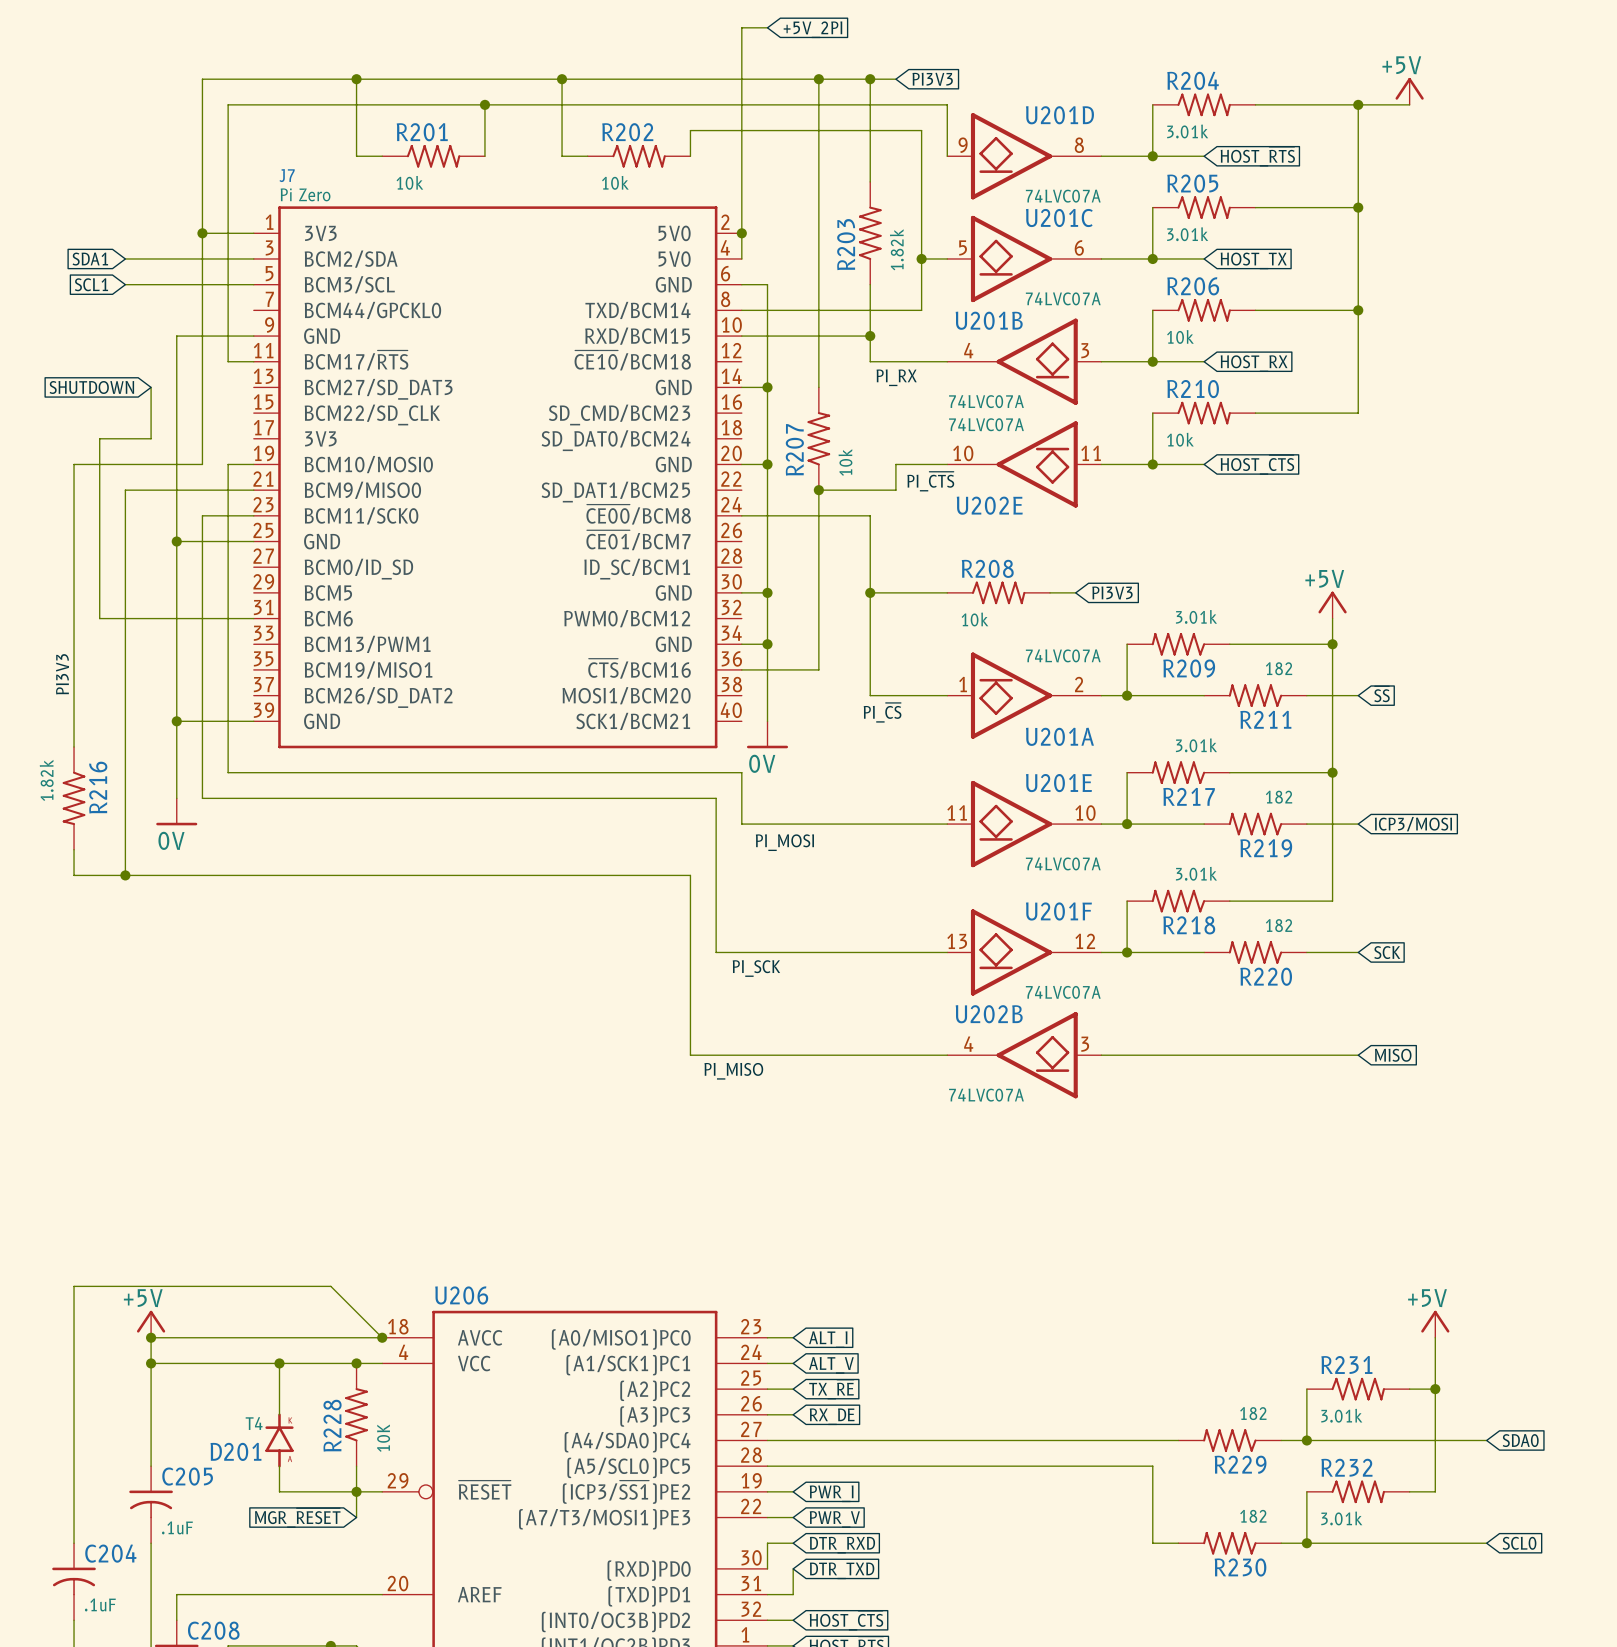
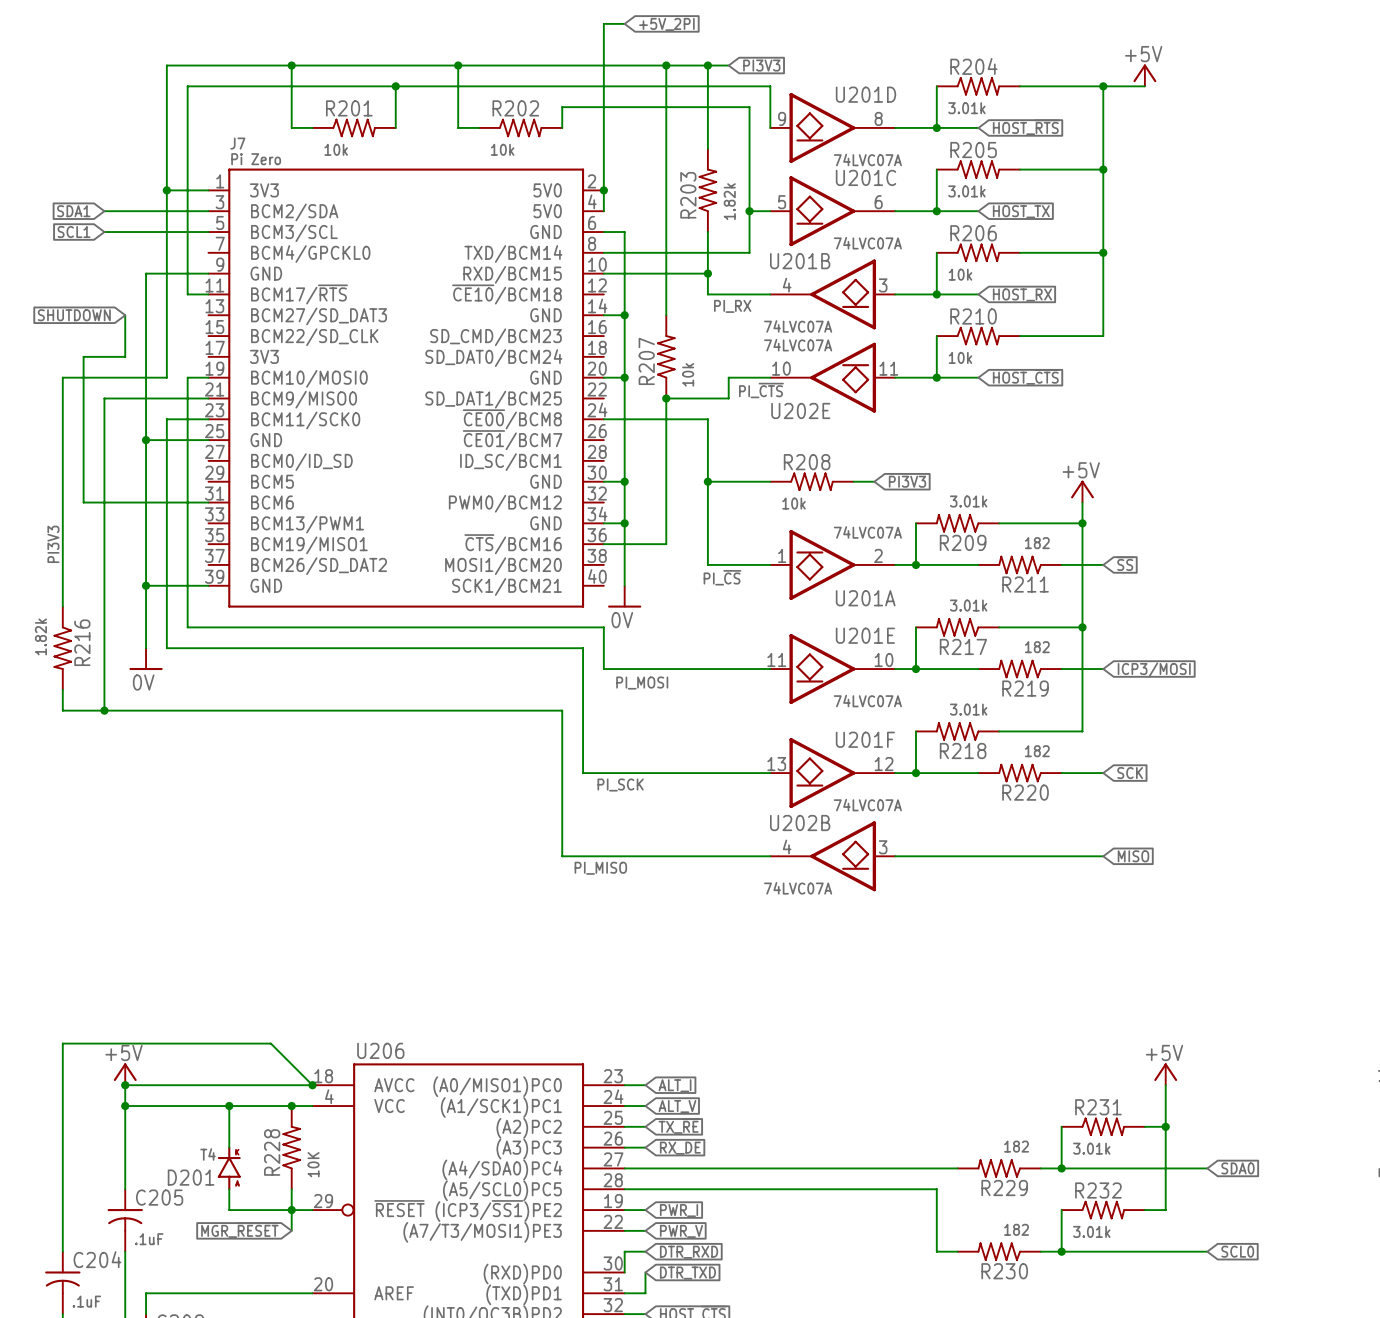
J7 pin name: BCM44/GPCKL0 (372, 310) -> BCM4/GPCKL0 (310, 254)

